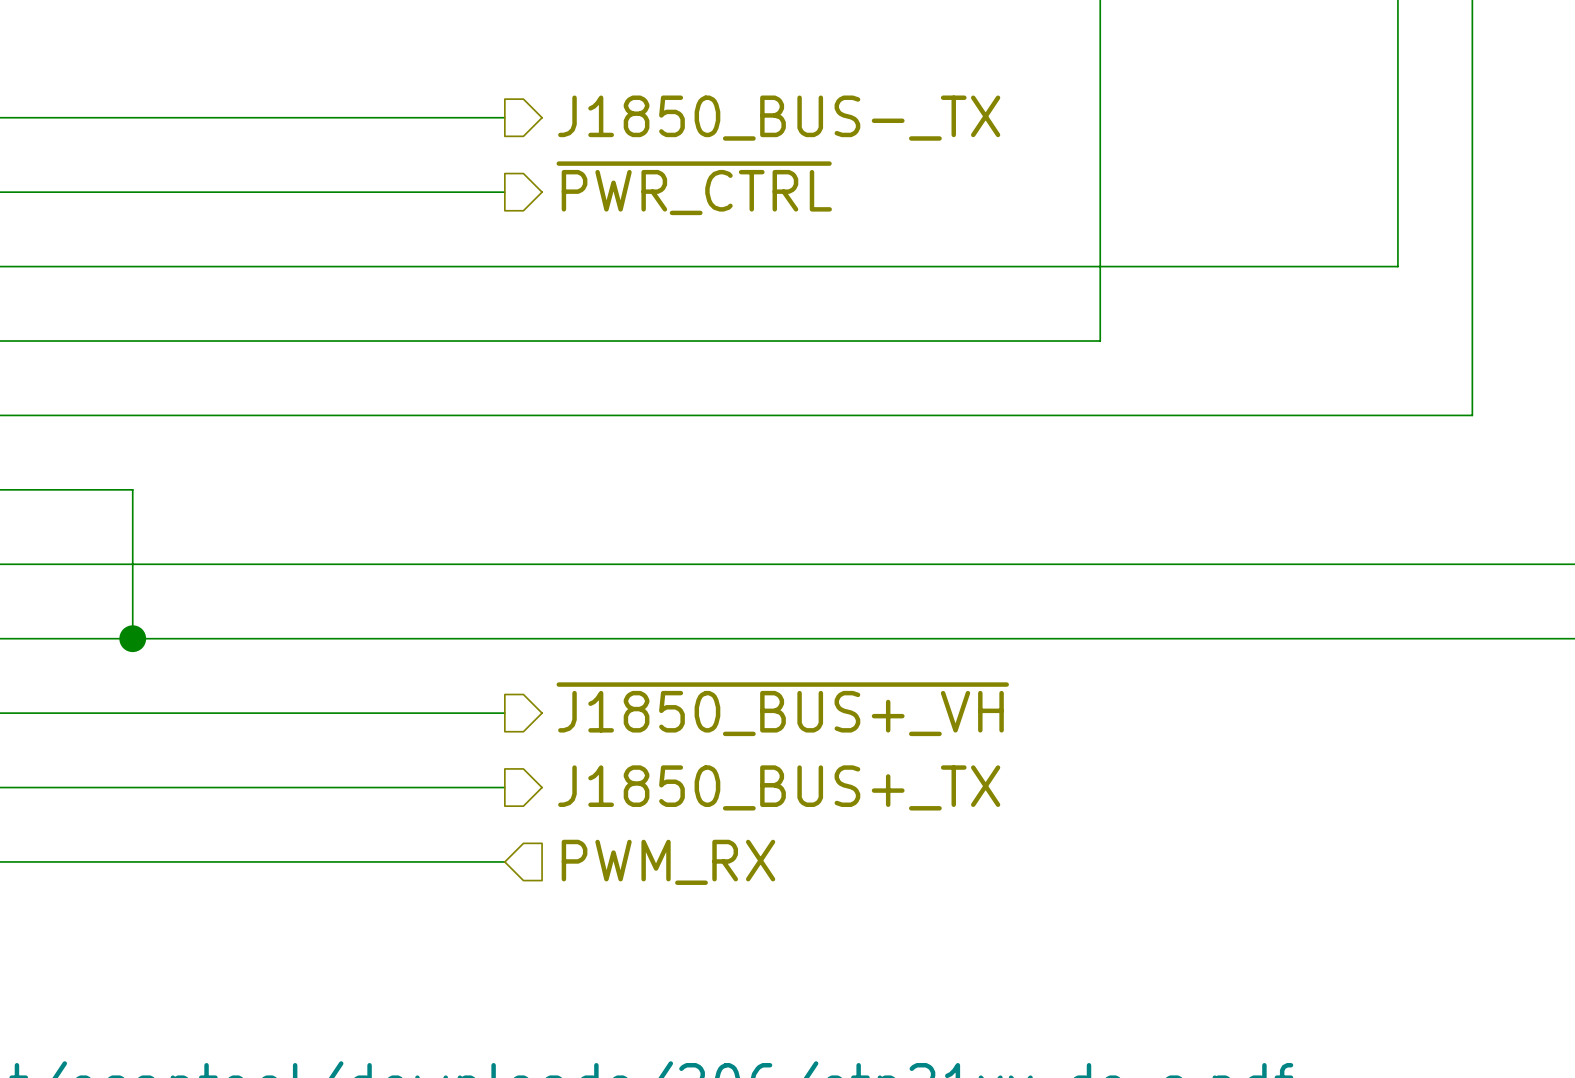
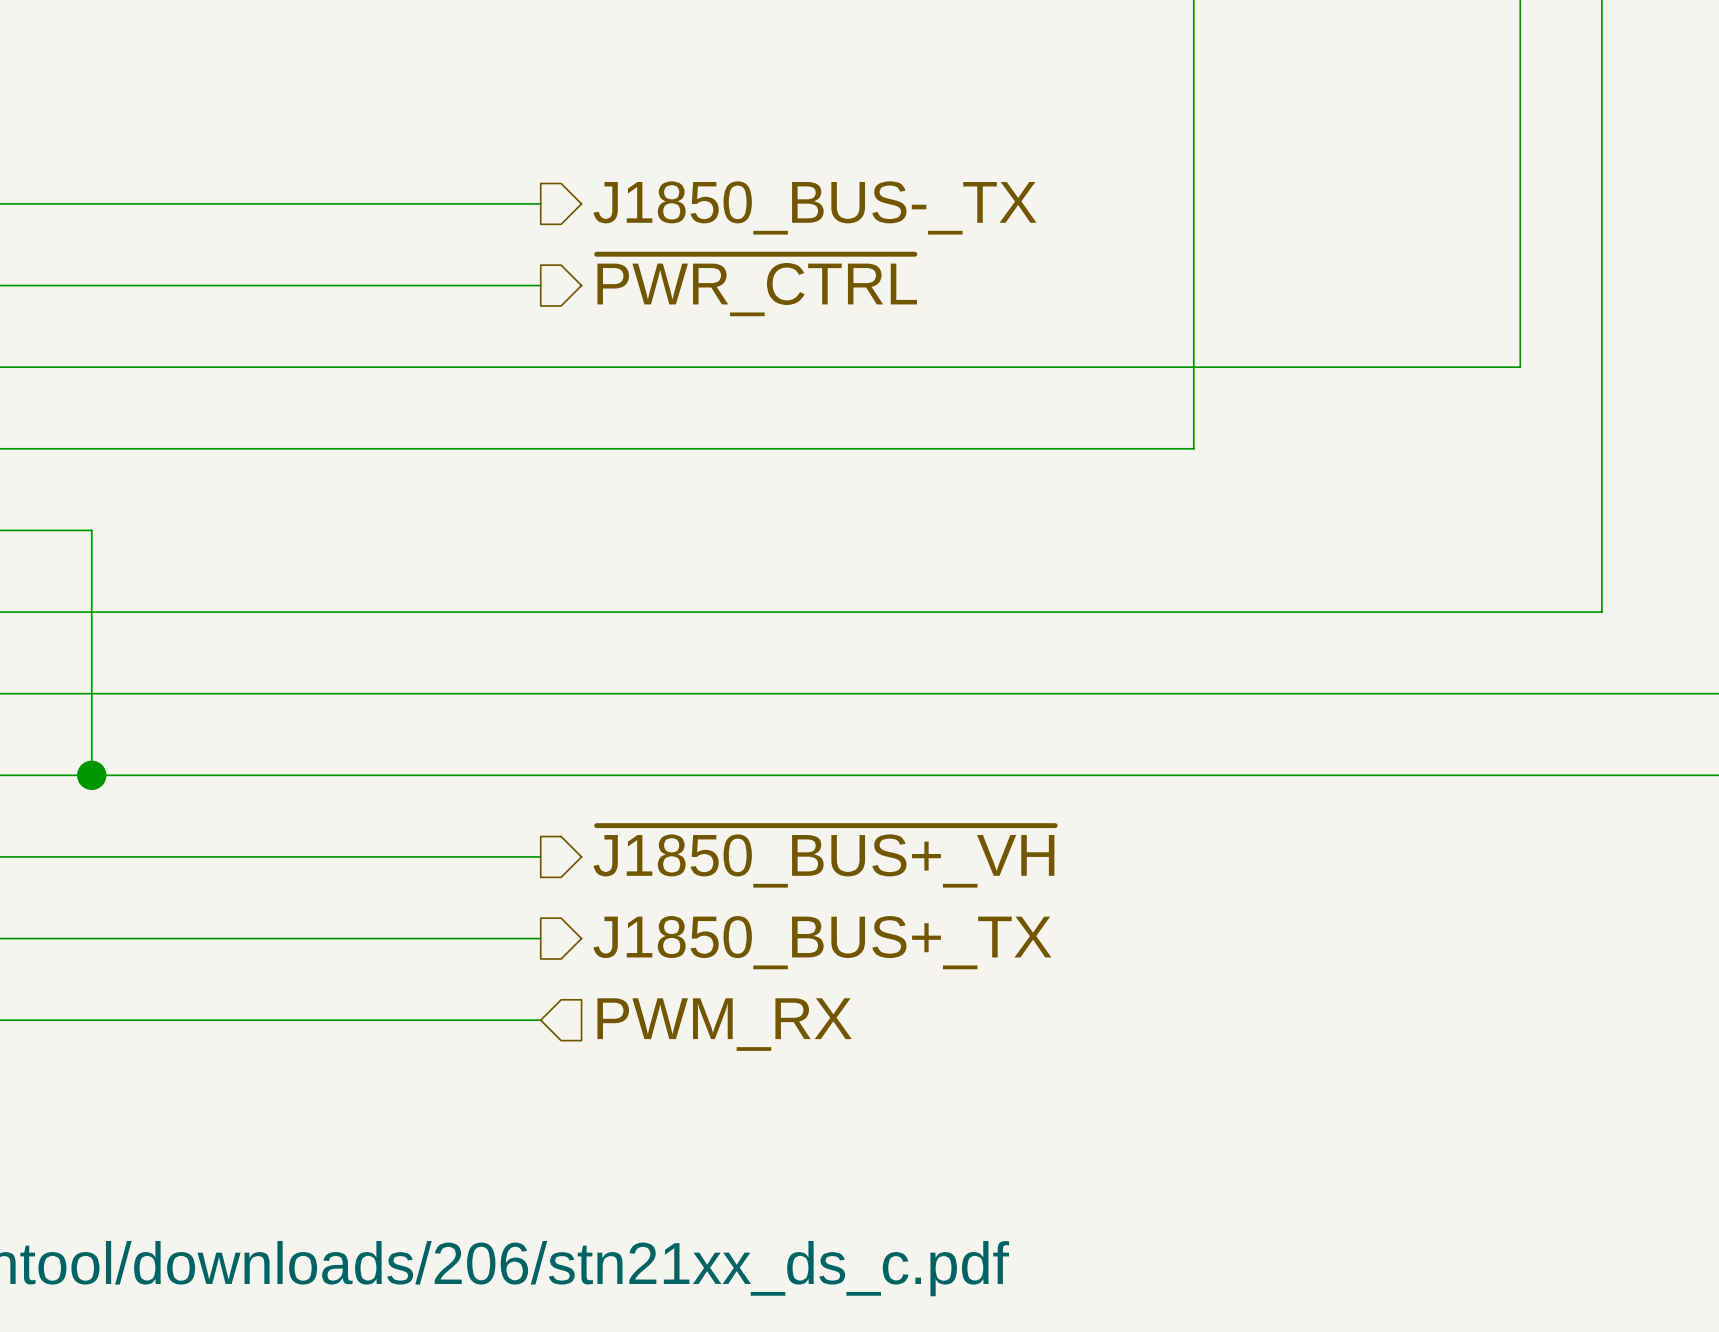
wire: (95, 415) (1472, 415) -> (132, 612) (1601, 612) (1601, 530)
wire: none -> (91, 530) (91, 775)
wire: (132, 489) (132, 638) -> none
junction position: (132, 638) -> (91, 775)

